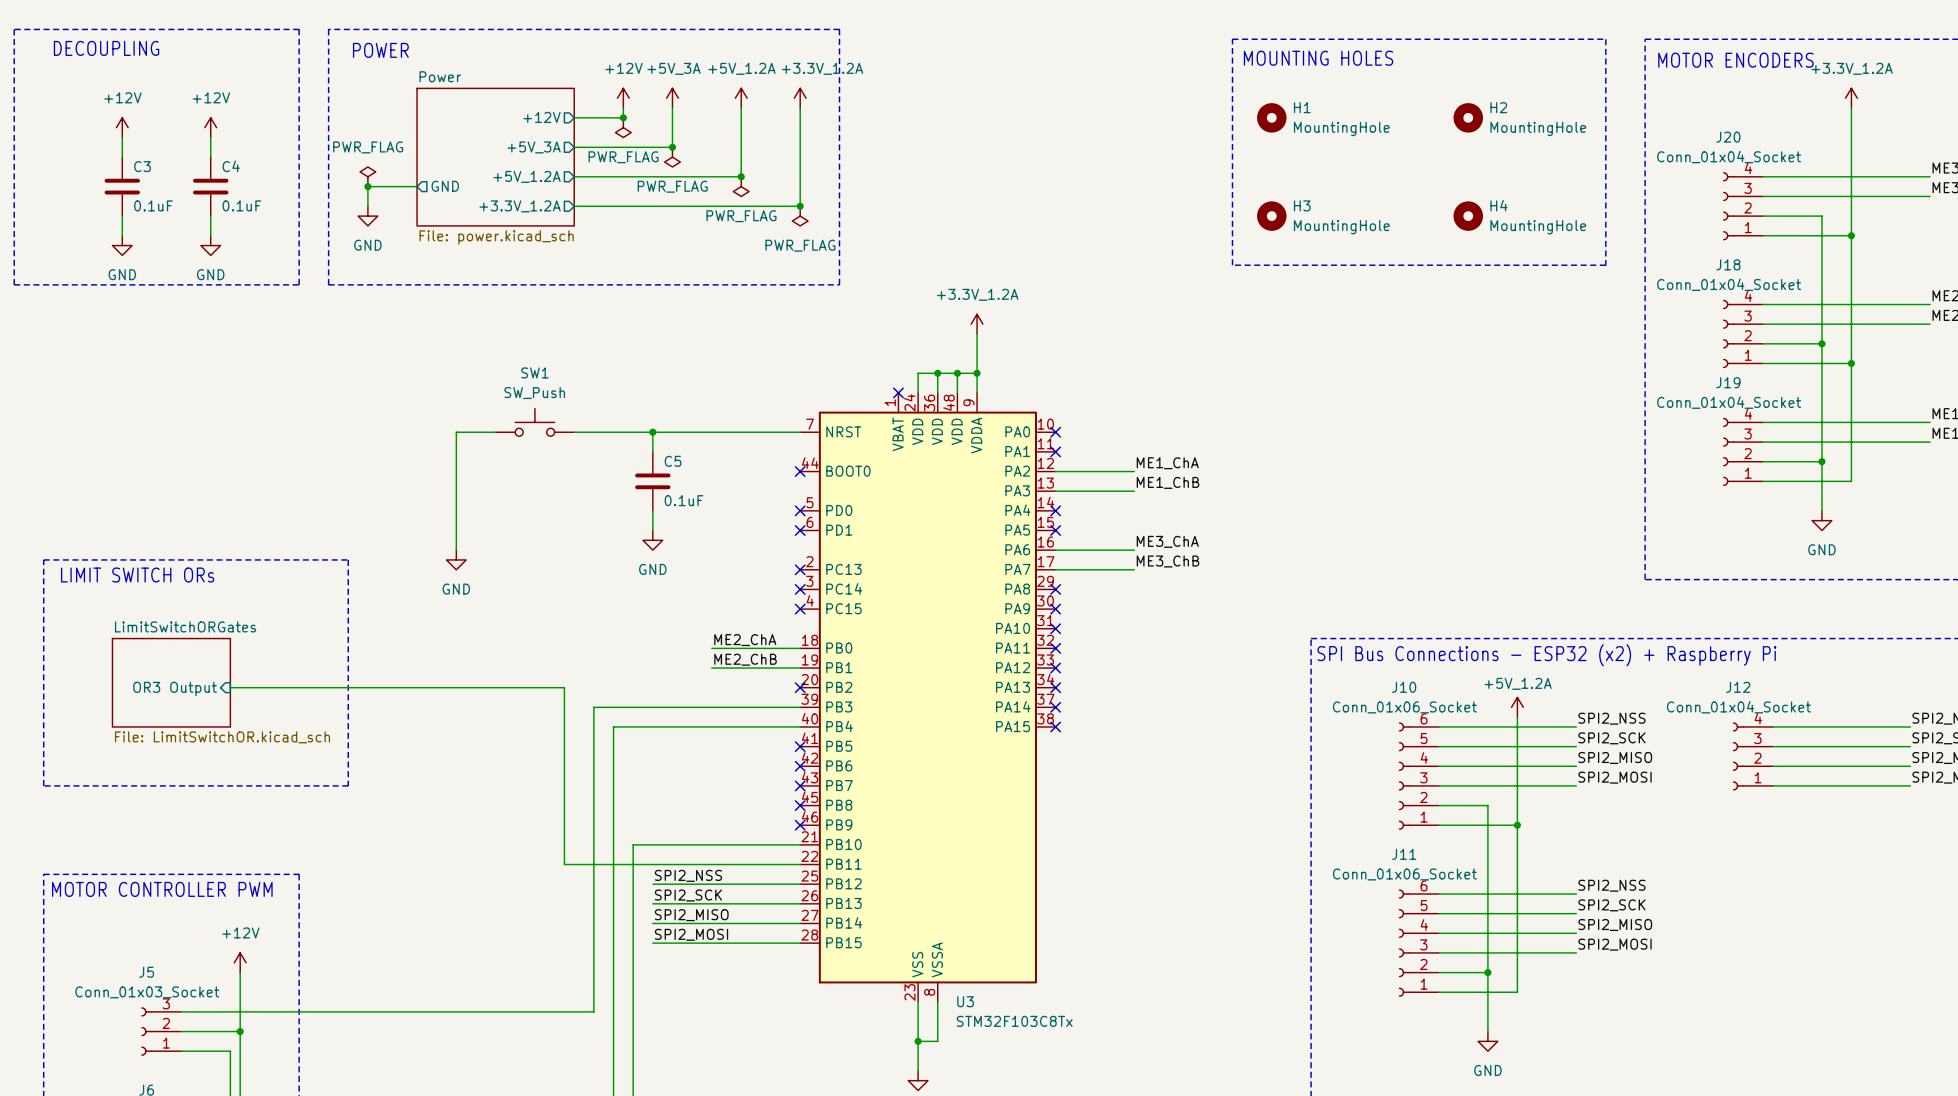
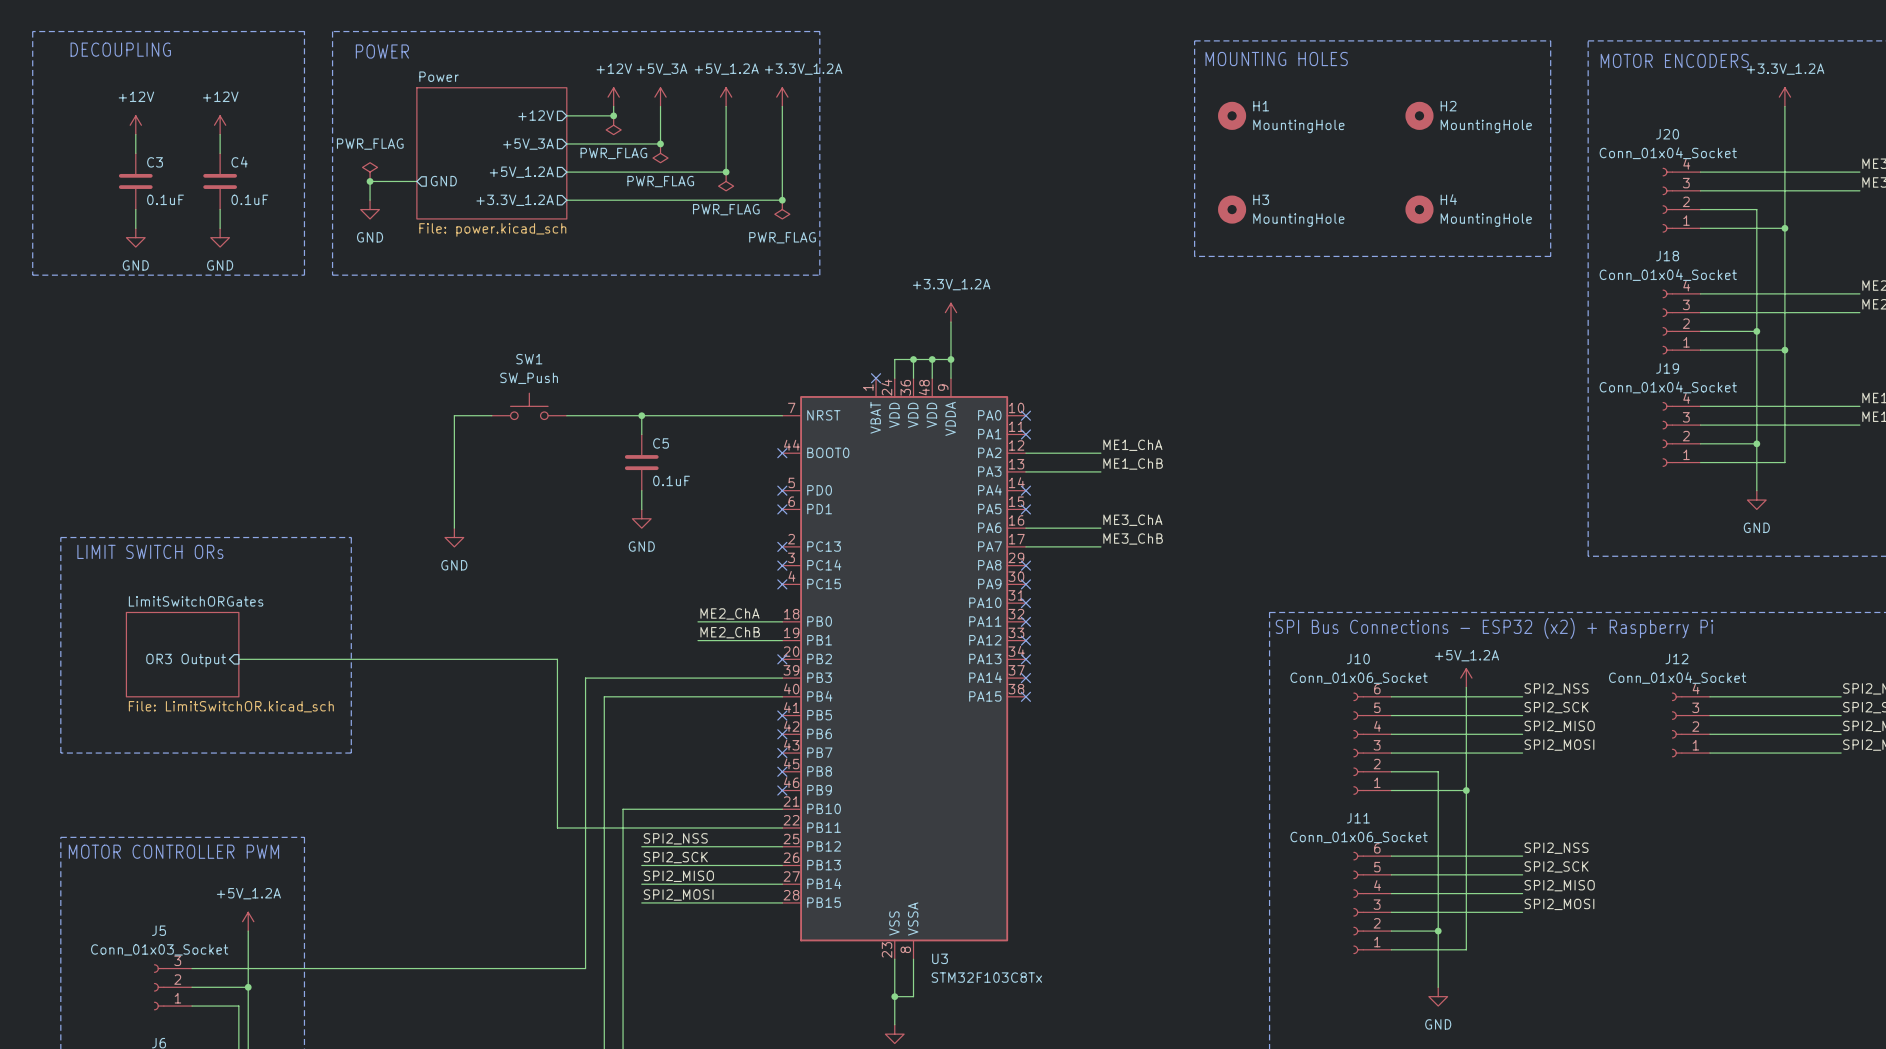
power symbol: +12V (240, 962) -> +5V_1.2A (248, 921)

